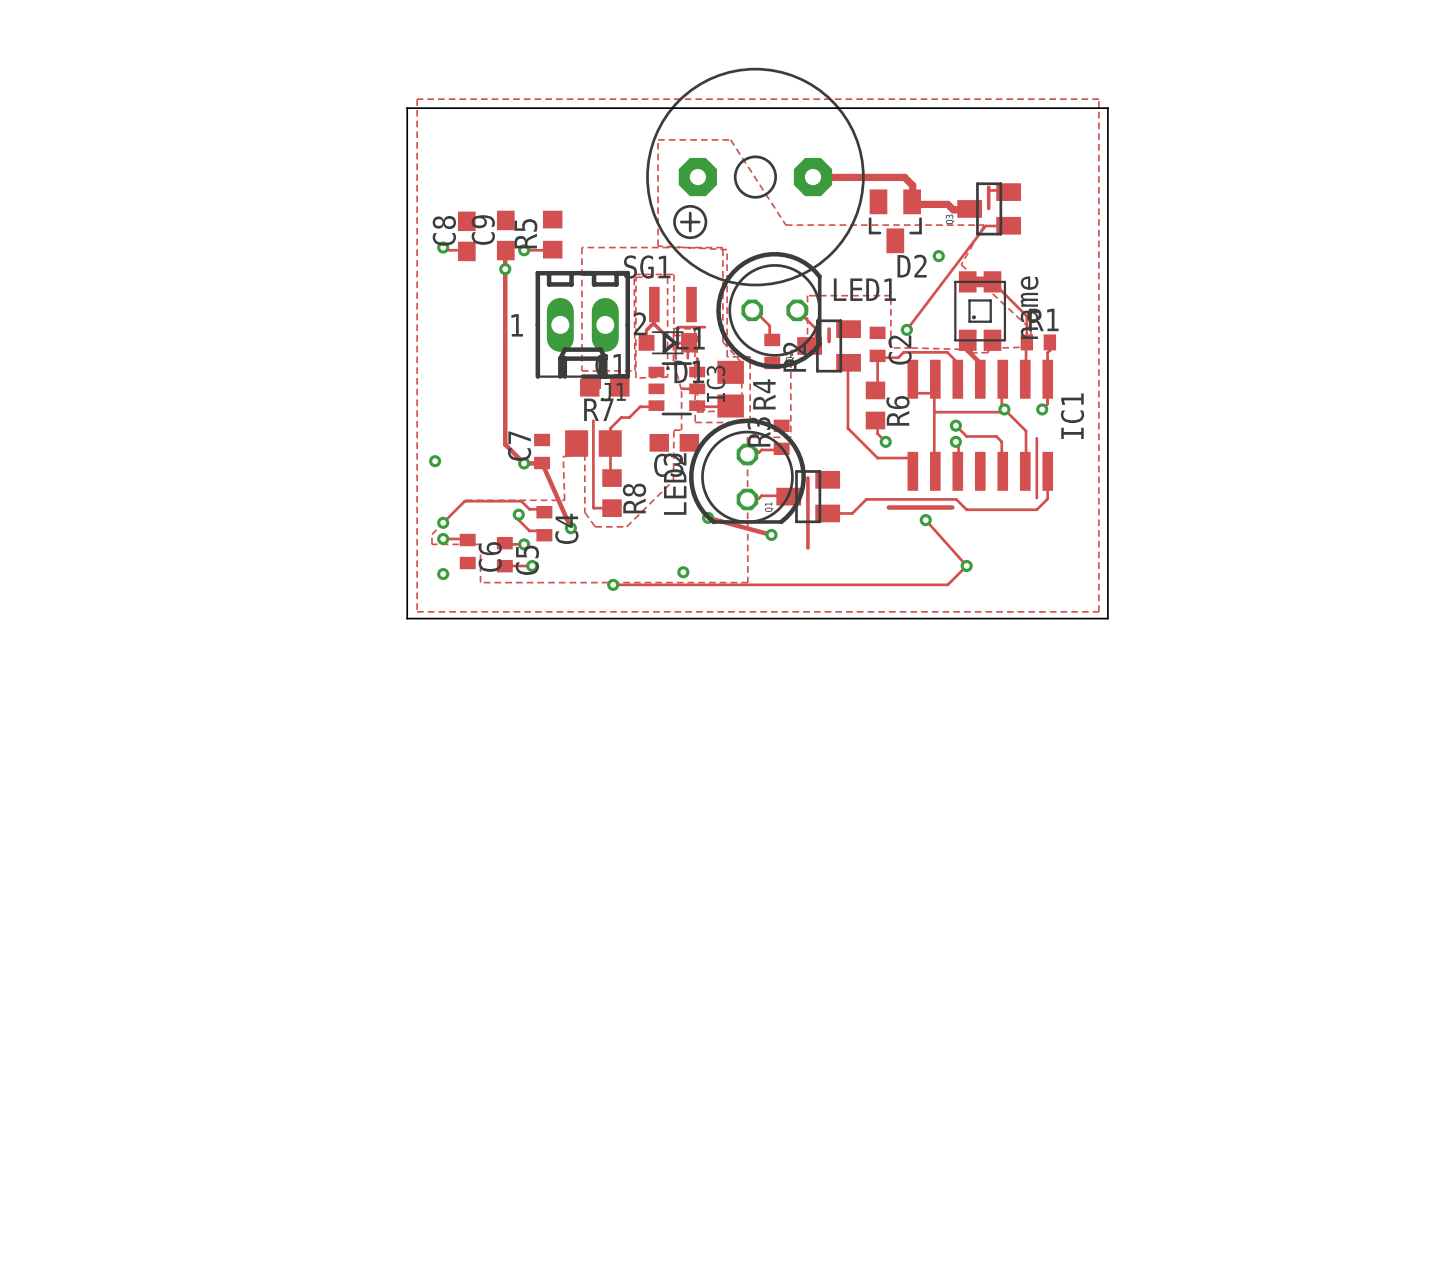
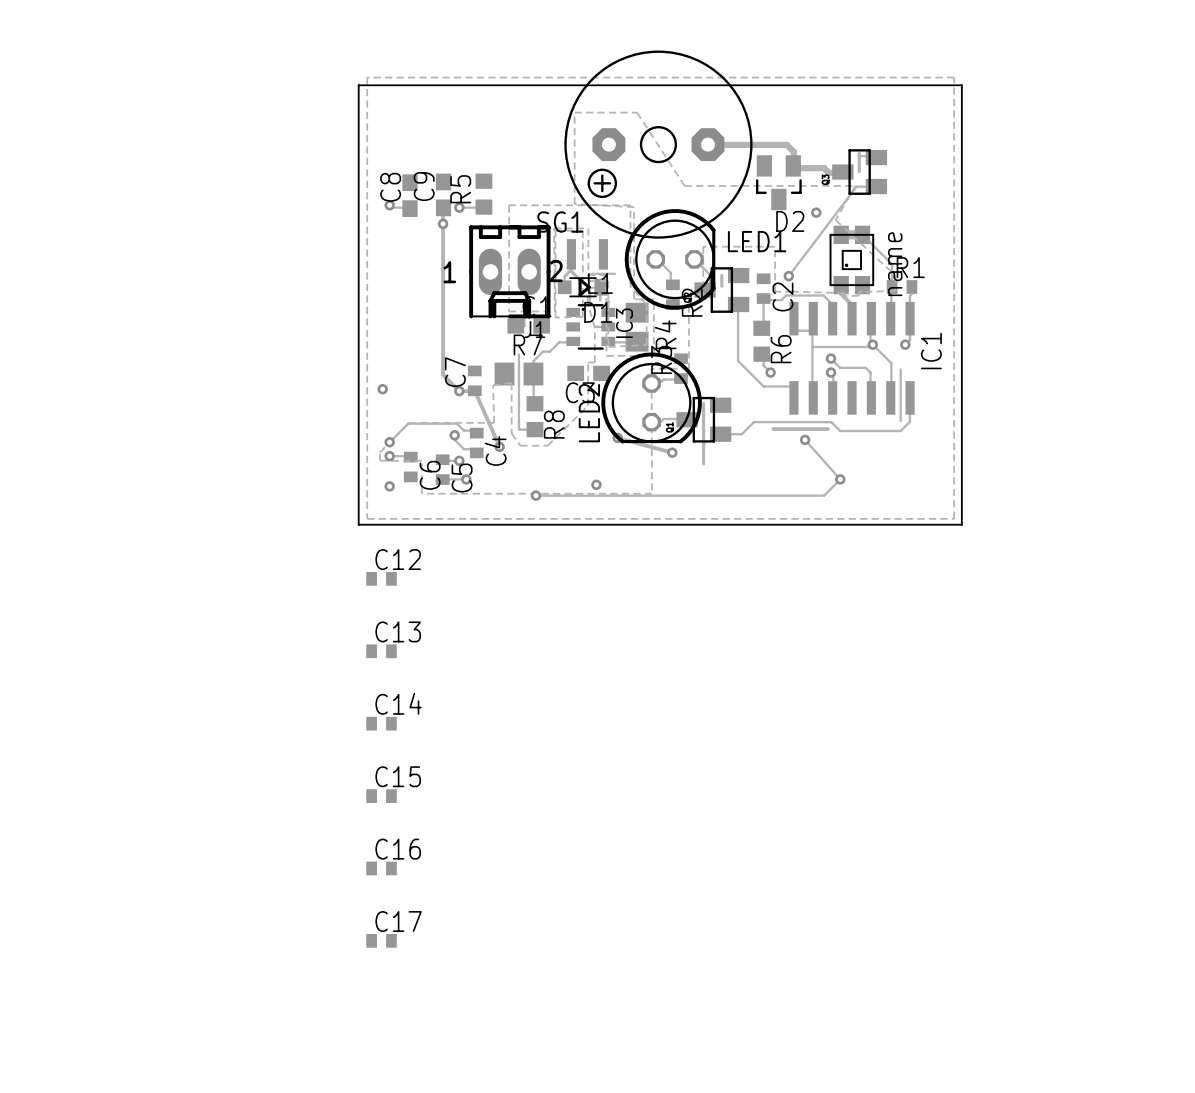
C12: none -> (381, 578)
C13: none -> (381, 651)
C14: none -> (381, 723)
C15: none -> (381, 796)
C16: none -> (381, 868)
C17: none -> (381, 940)

